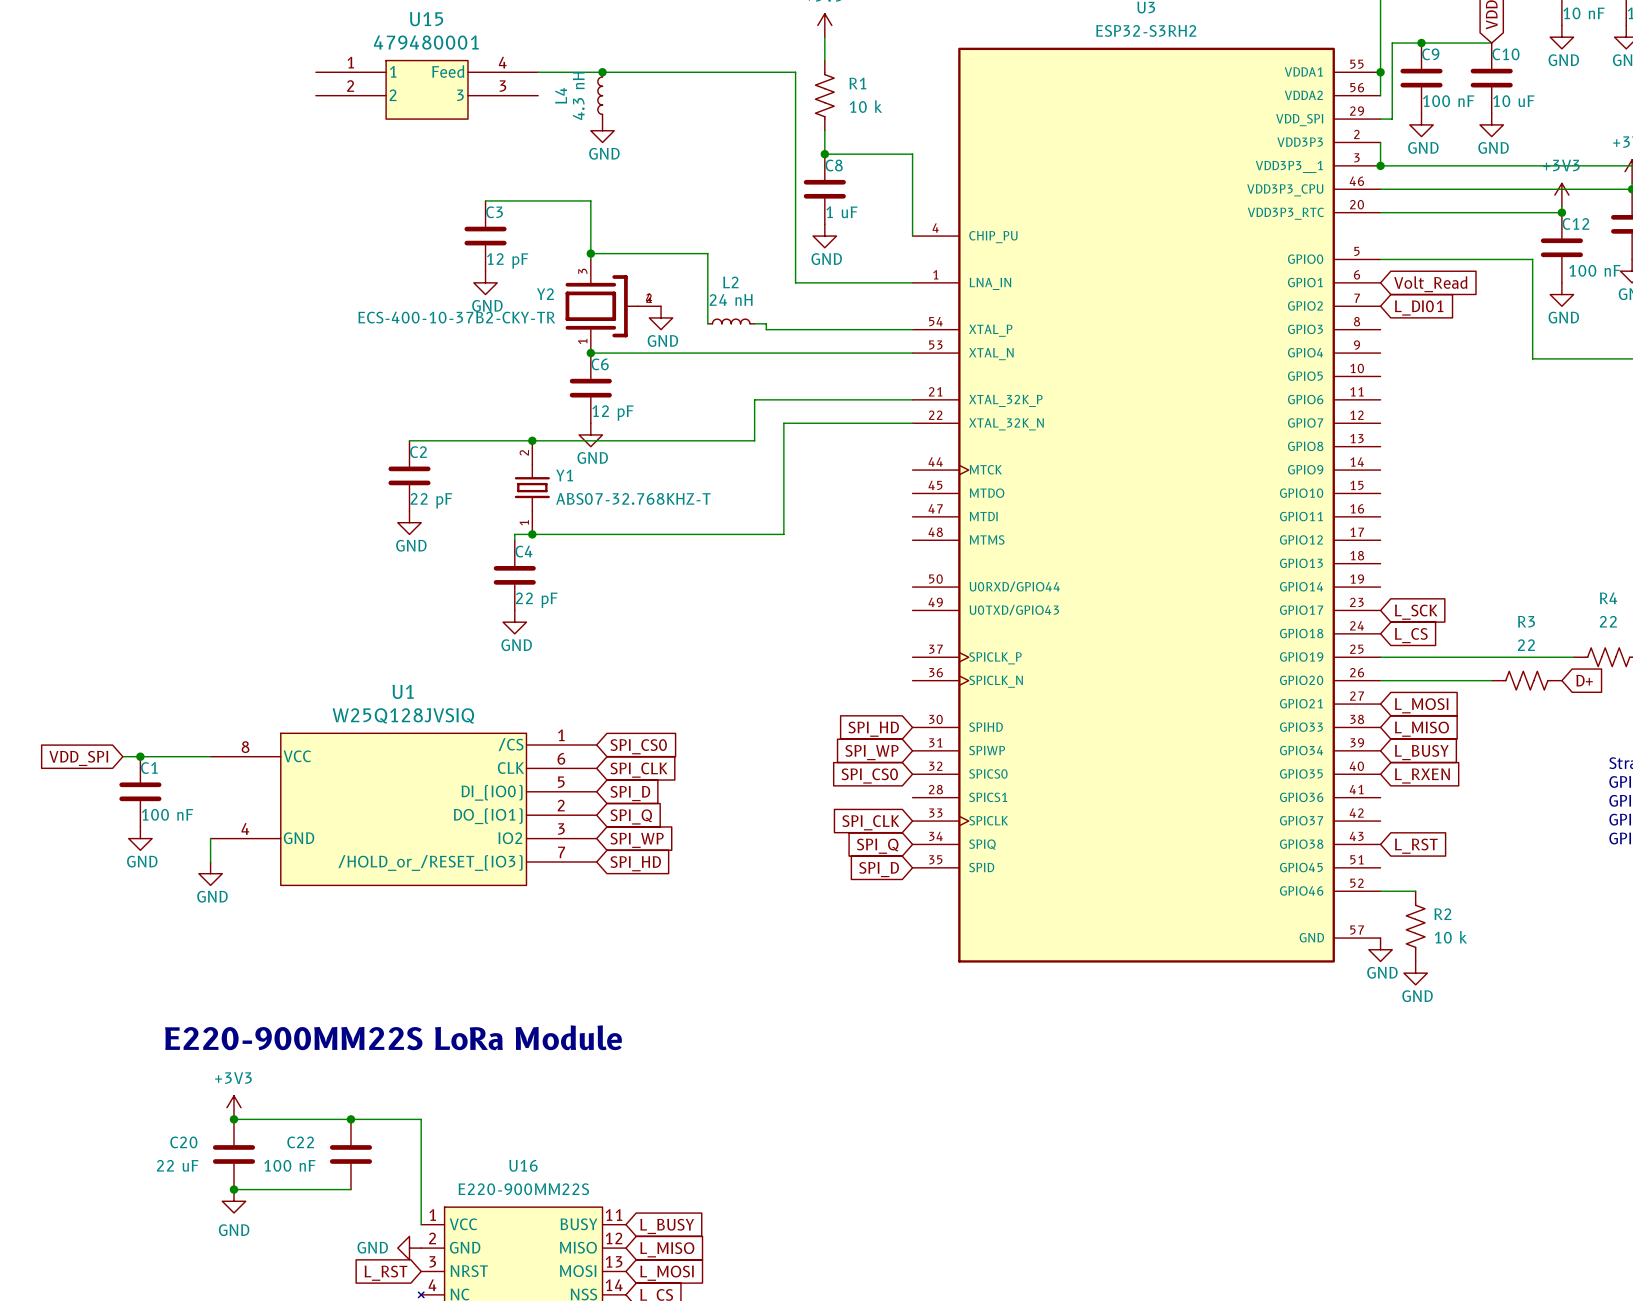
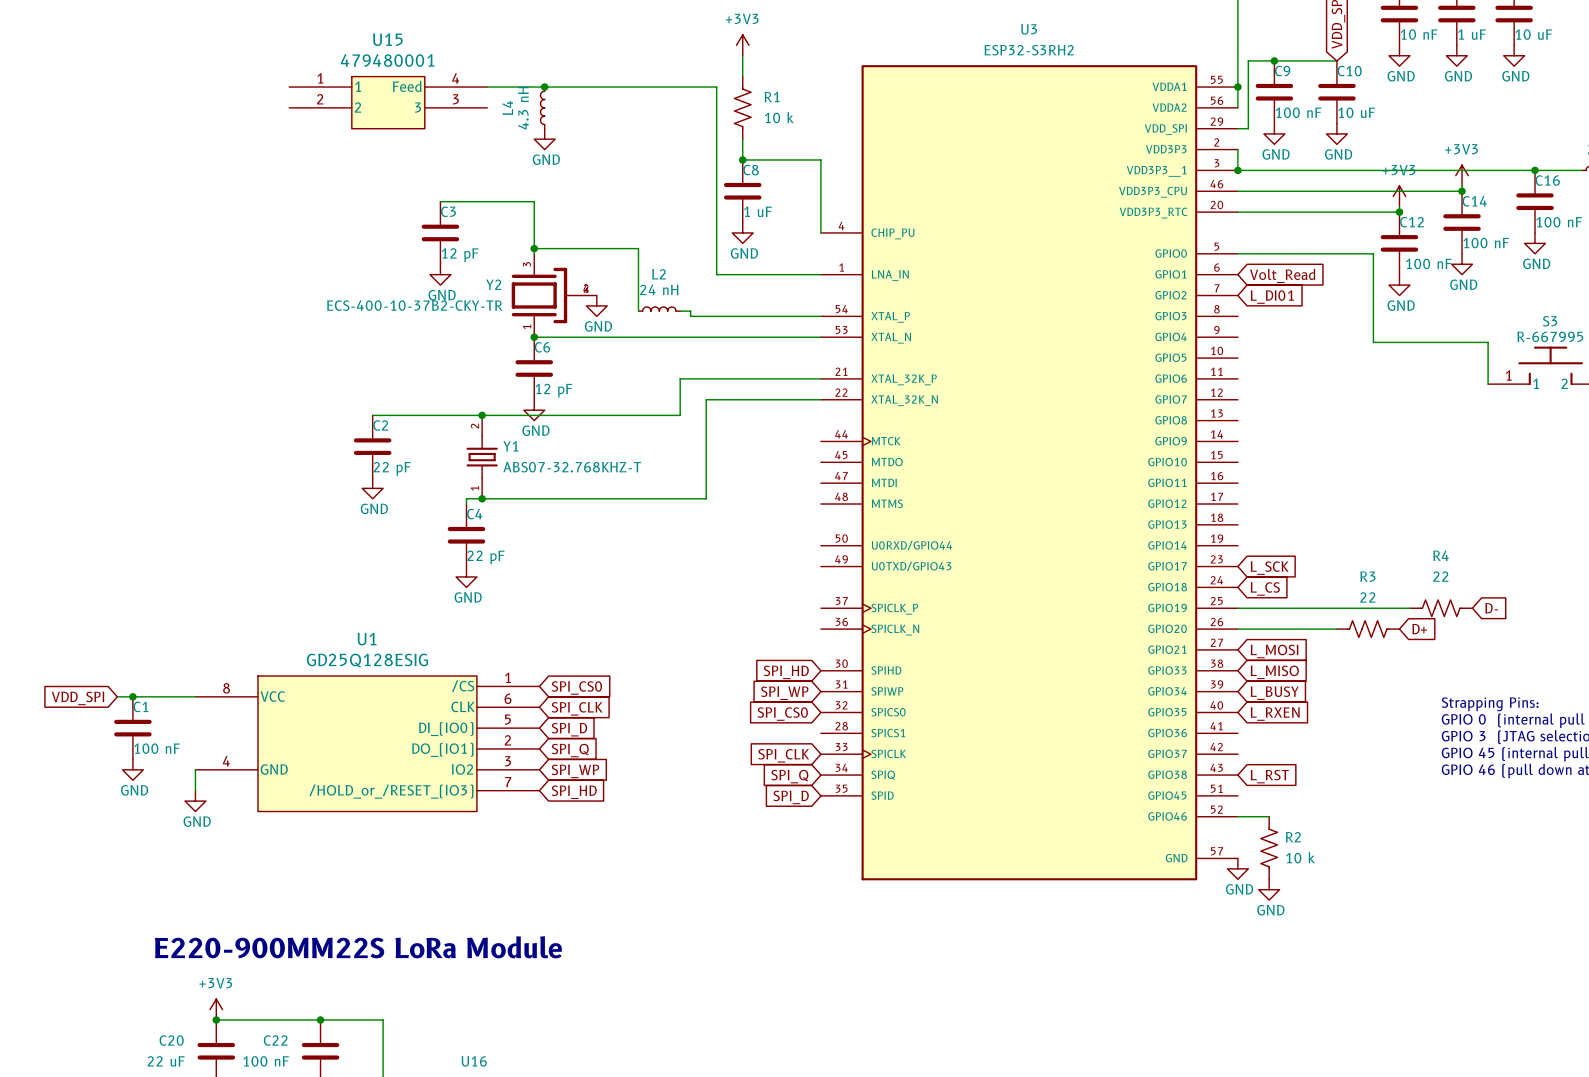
U1 value: W25Q128JVSIQ (403, 715) -> GD25Q128ESIG (367, 660)

